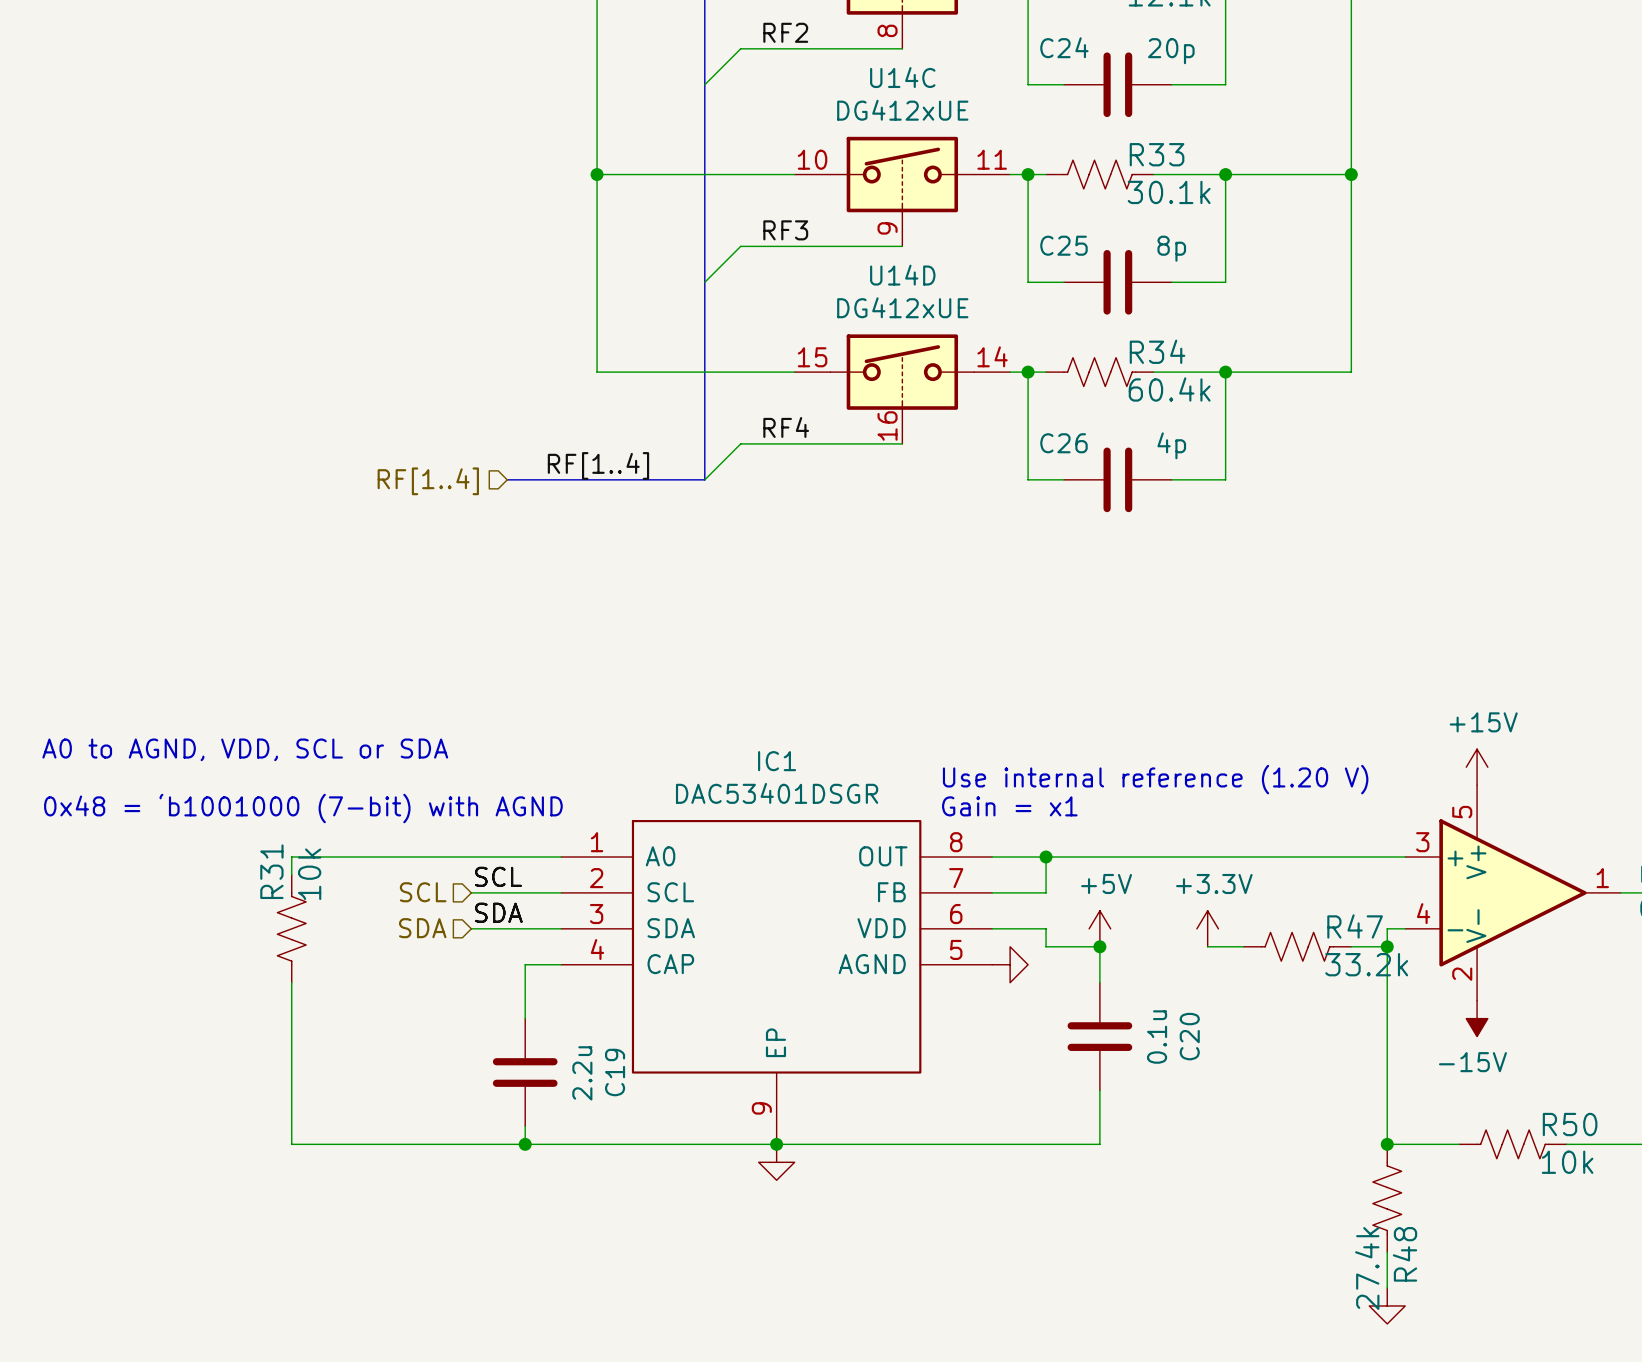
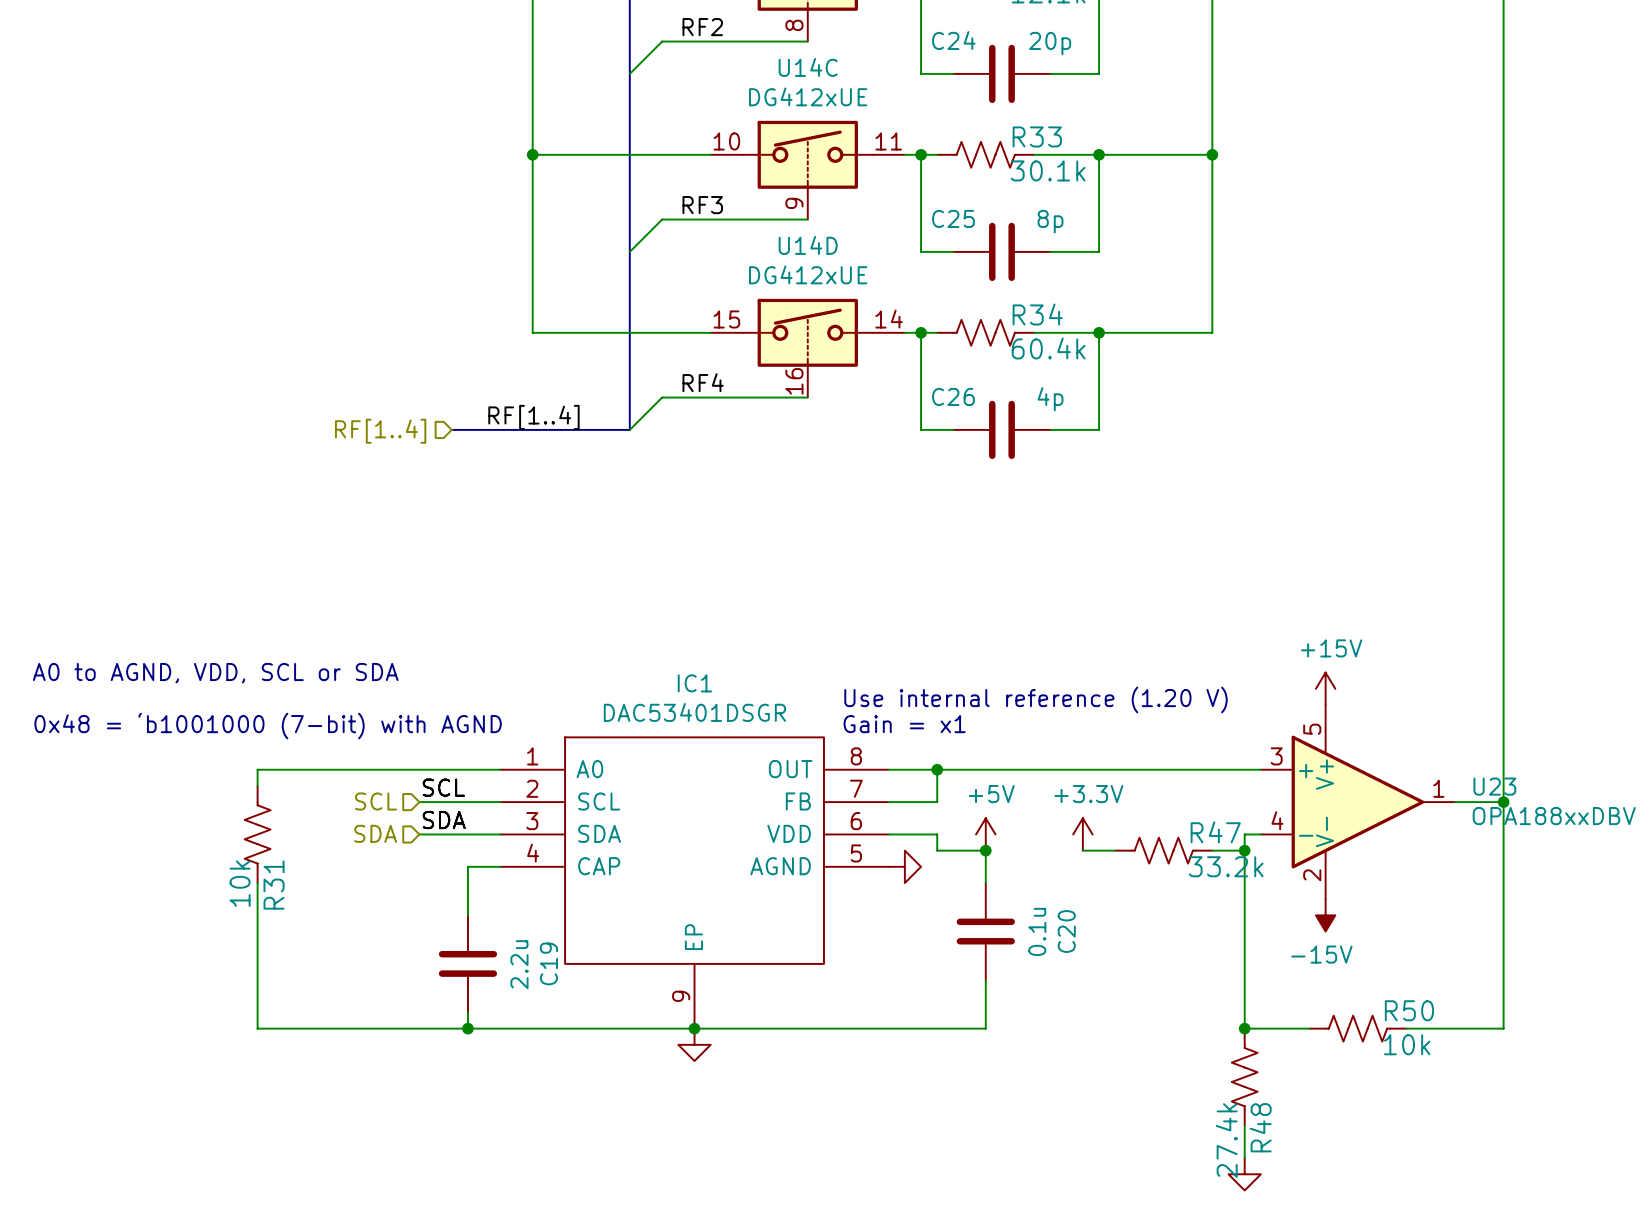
R31 name position: R31 (271, 871) -> R31 (274, 885)
R31 value position: 10k (309, 874) -> 10k (240, 883)

